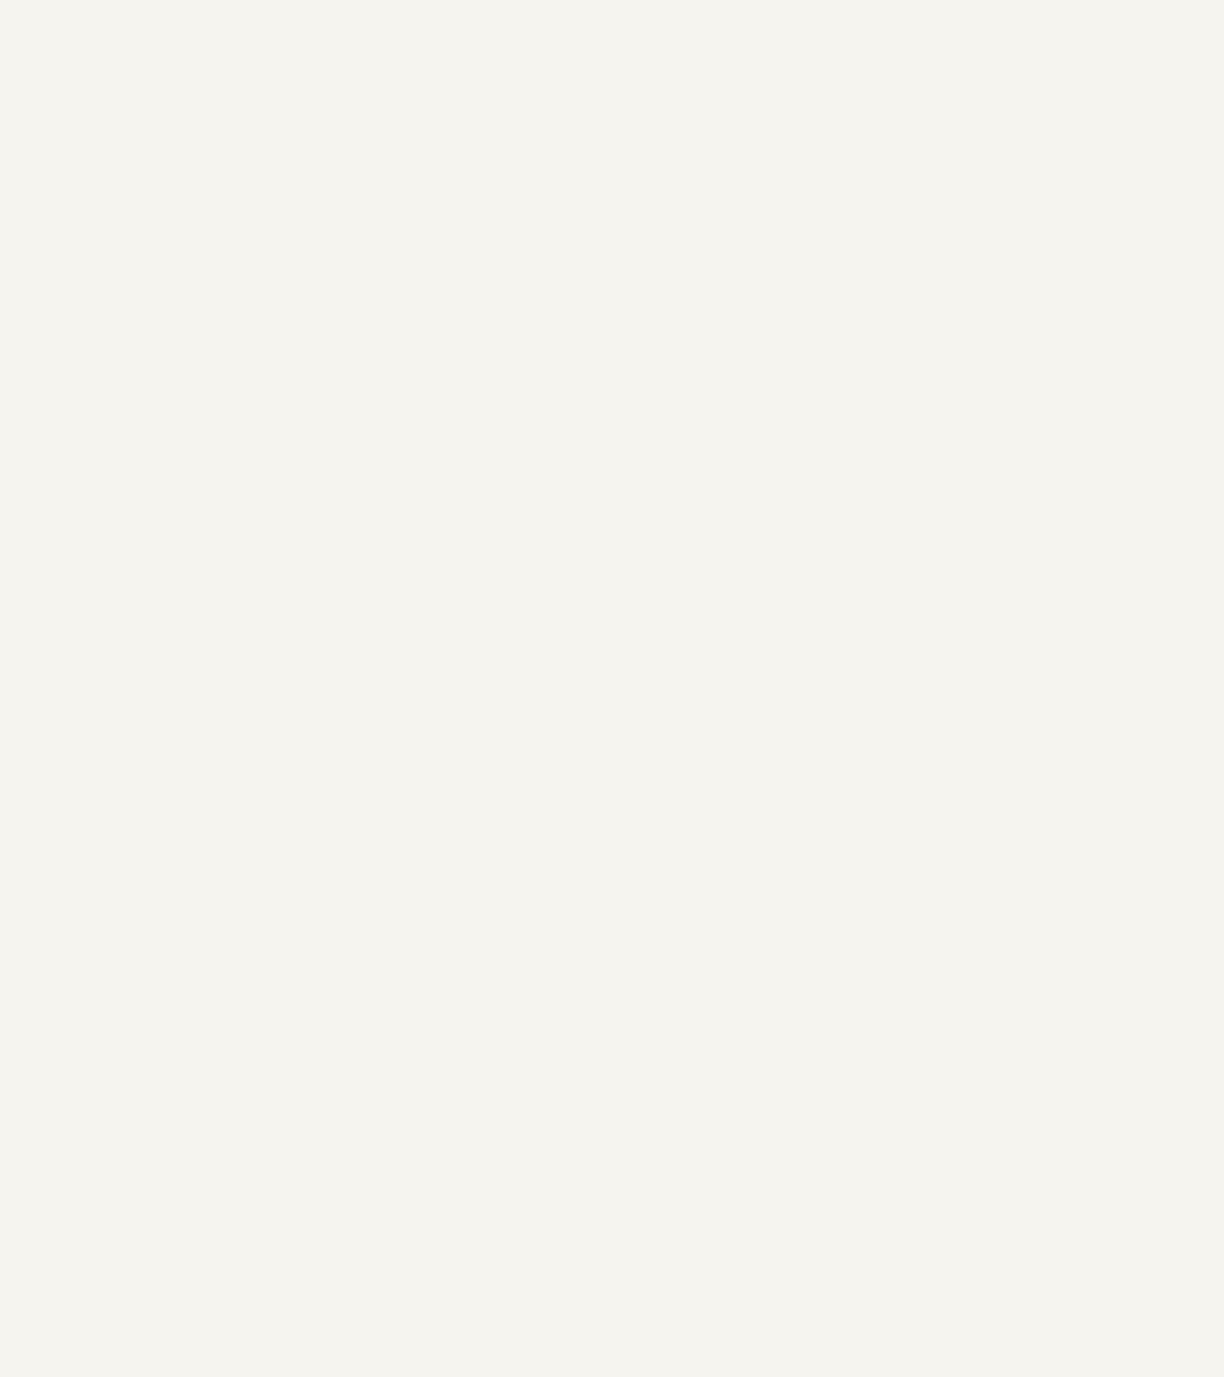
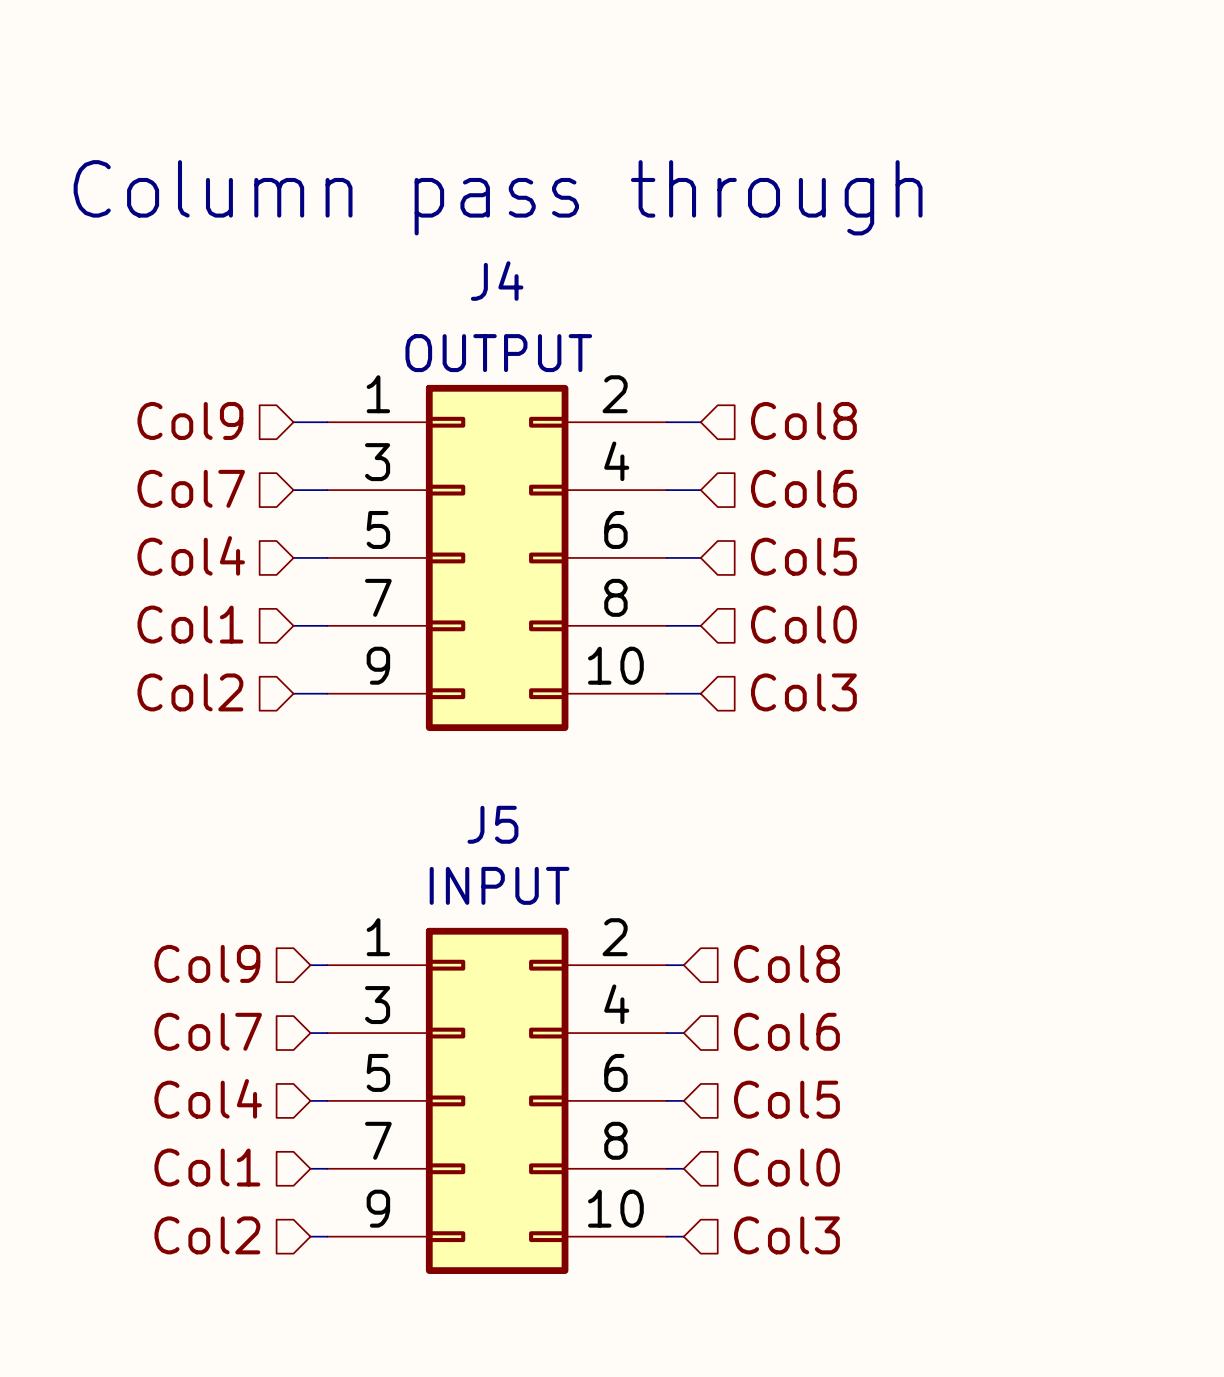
text: none -> Column pass through (498, 197)
hierarchical label: none -> Col9 (190, 420)
hierarchical label: none -> Col8 (803, 420)
wire: none -> (293, 422) (327, 422)
wire: none -> (666, 422) (700, 422)
hierarchical label: none -> Col7 (191, 488)
hierarchical label: none -> Col6 (803, 488)
wire: none -> (293, 490) (327, 490)
wire: none -> (666, 490) (700, 490)
hierarchical label: none -> Col4 (191, 555)
hierarchical label: none -> Col5 (803, 556)
wire: none -> (293, 557) (327, 557)
J4: none -> OUTPUT (497, 557)
wire: none -> (666, 557) (700, 557)
hierarchical label: none -> Col1 (190, 624)
hierarchical label: none -> Col0 (803, 624)
wire: none -> (293, 625) (327, 625)
wire: none -> (666, 625) (700, 625)
hierarchical label: none -> Col2 (190, 692)
hierarchical label: none -> Col3 (803, 692)
wire: none -> (293, 693) (327, 693)
wire: none -> (666, 693) (700, 693)
hierarchical label: none -> Col9 (207, 963)
hierarchical label: none -> Col8 (786, 963)
wire: none -> (310, 965) (327, 965)
wire: none -> (666, 965) (683, 965)
hierarchical label: none -> Col7 (208, 1031)
hierarchical label: none -> Col6 (786, 1031)
wire: none -> (310, 1033) (327, 1033)
wire: none -> (666, 1033) (683, 1033)
hierarchical label: none -> Col4 (208, 1098)
hierarchical label: none -> Col5 (786, 1099)
wire: none -> (310, 1100) (327, 1100)
J5: none -> INPUT (497, 1100)
wire: none -> (666, 1100) (683, 1100)
hierarchical label: none -> Col1 (207, 1167)
hierarchical label: none -> Col0 (786, 1167)
wire: none -> (310, 1168) (327, 1168)
wire: none -> (666, 1168) (683, 1168)
hierarchical label: none -> Col2 (207, 1235)
hierarchical label: none -> Col3 (786, 1235)
wire: none -> (310, 1236) (327, 1236)
wire: none -> (666, 1236) (683, 1236)

